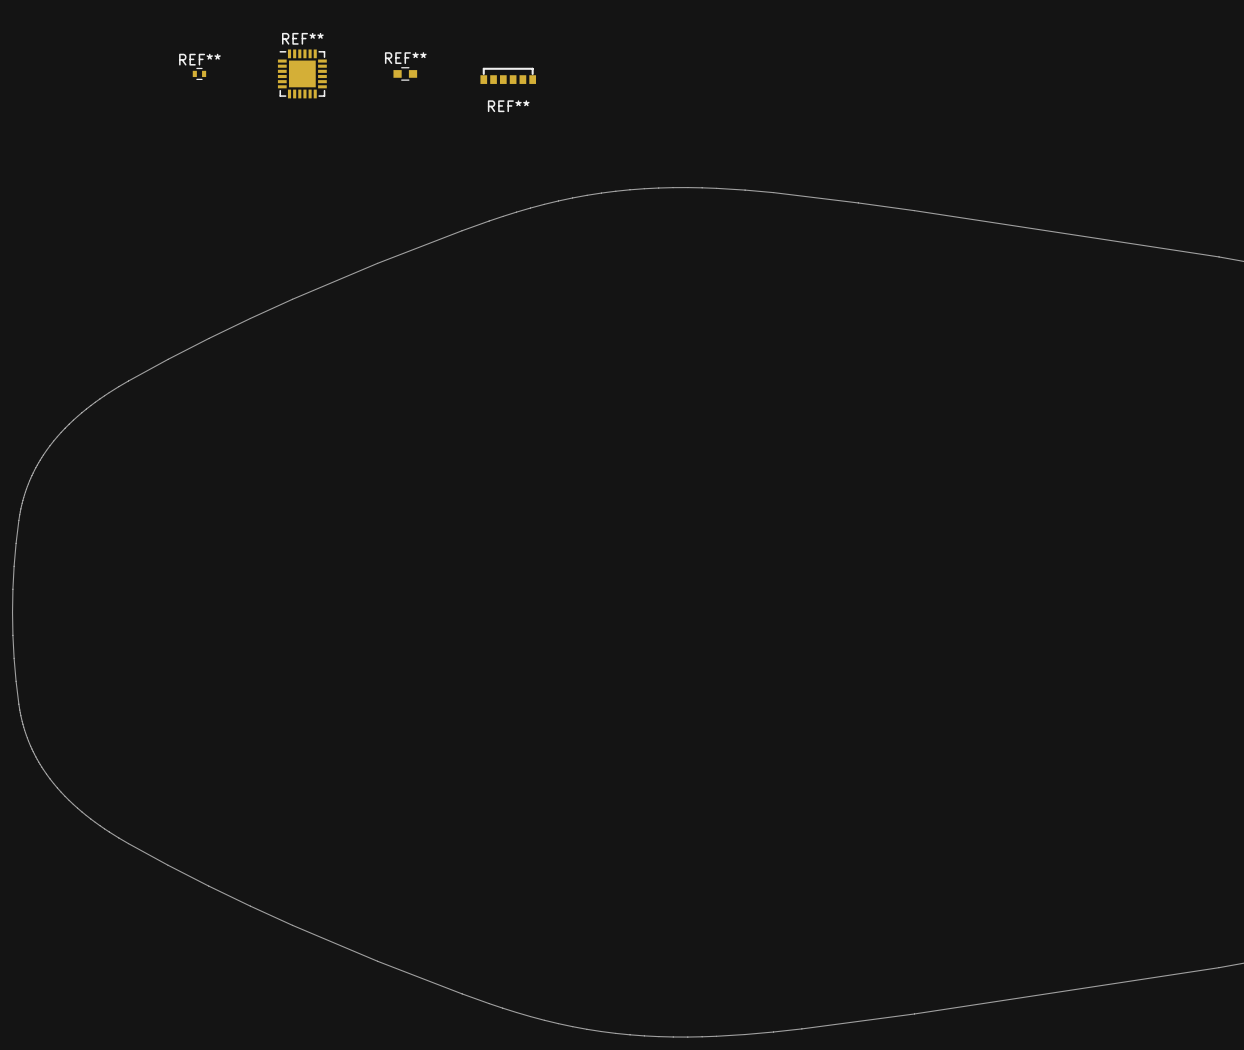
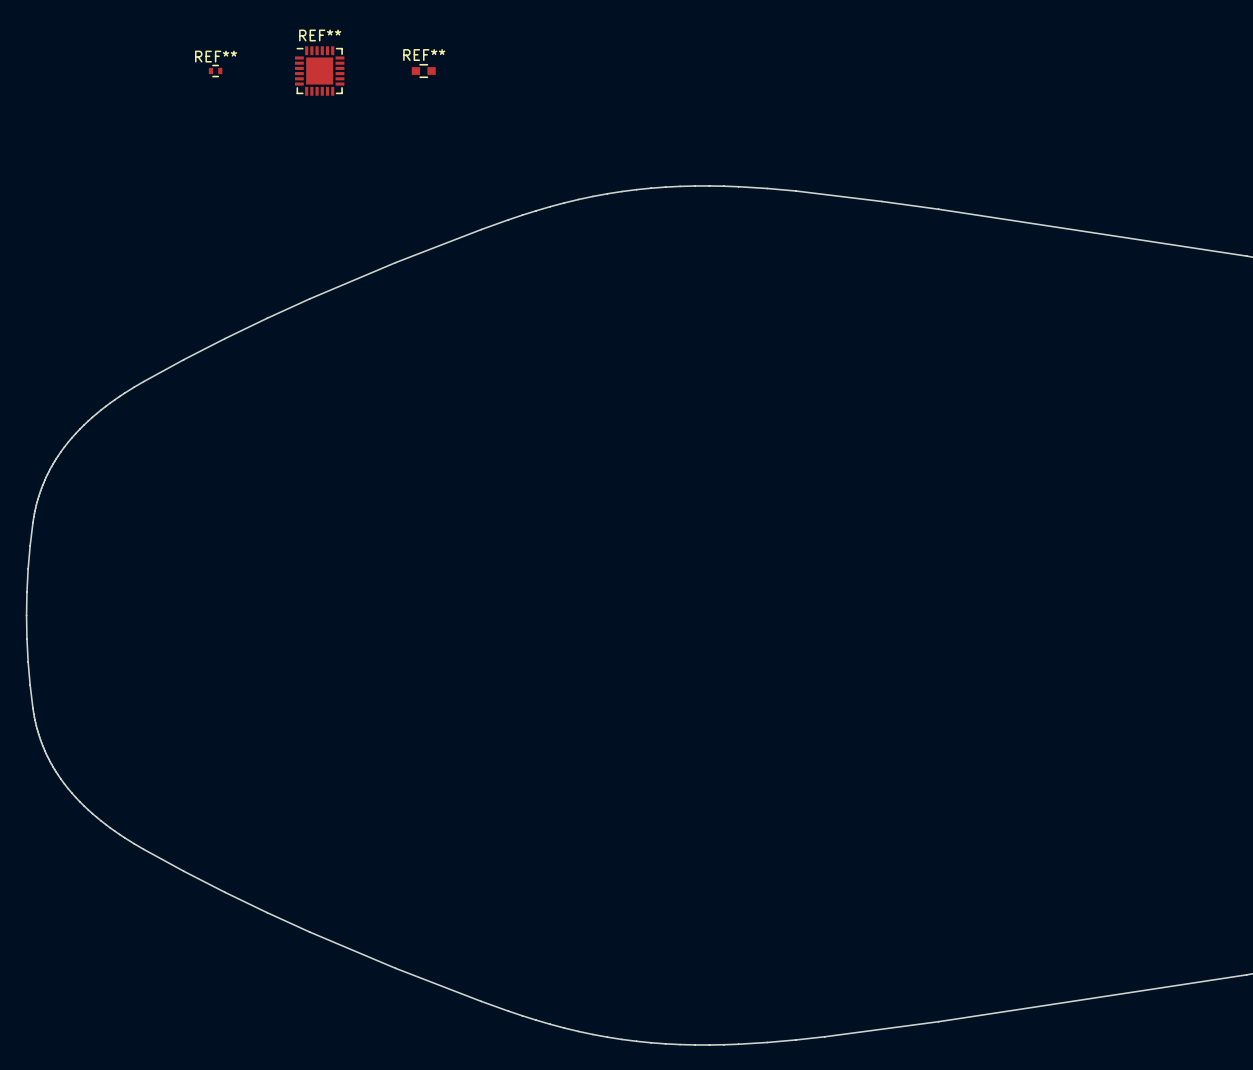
REF**: (508, 75) -> none

